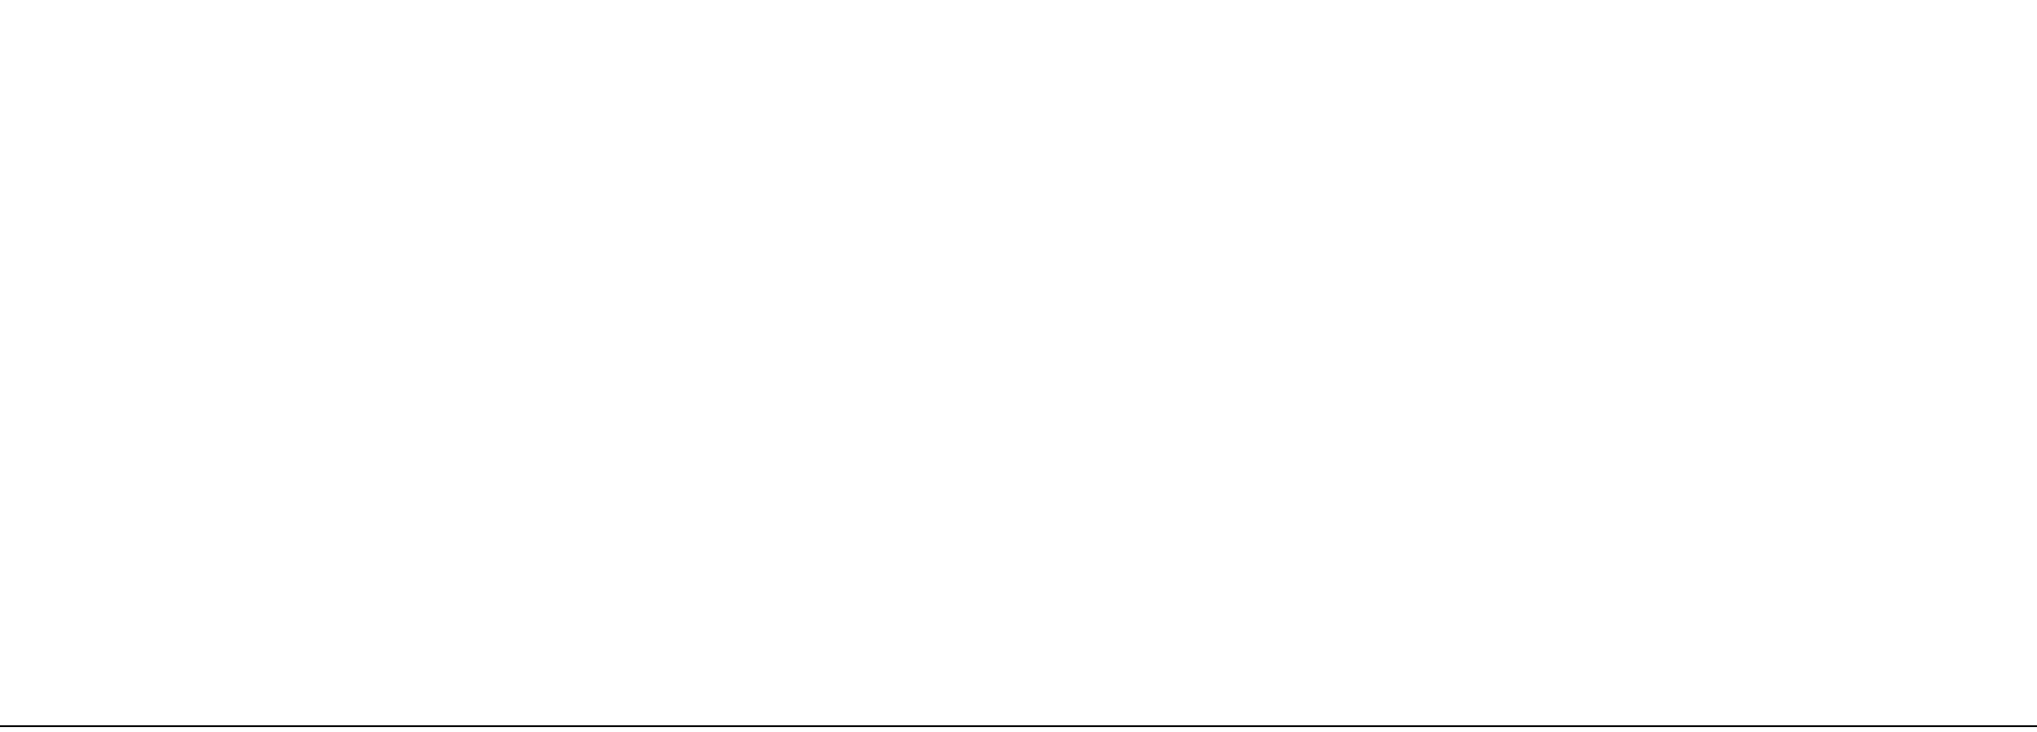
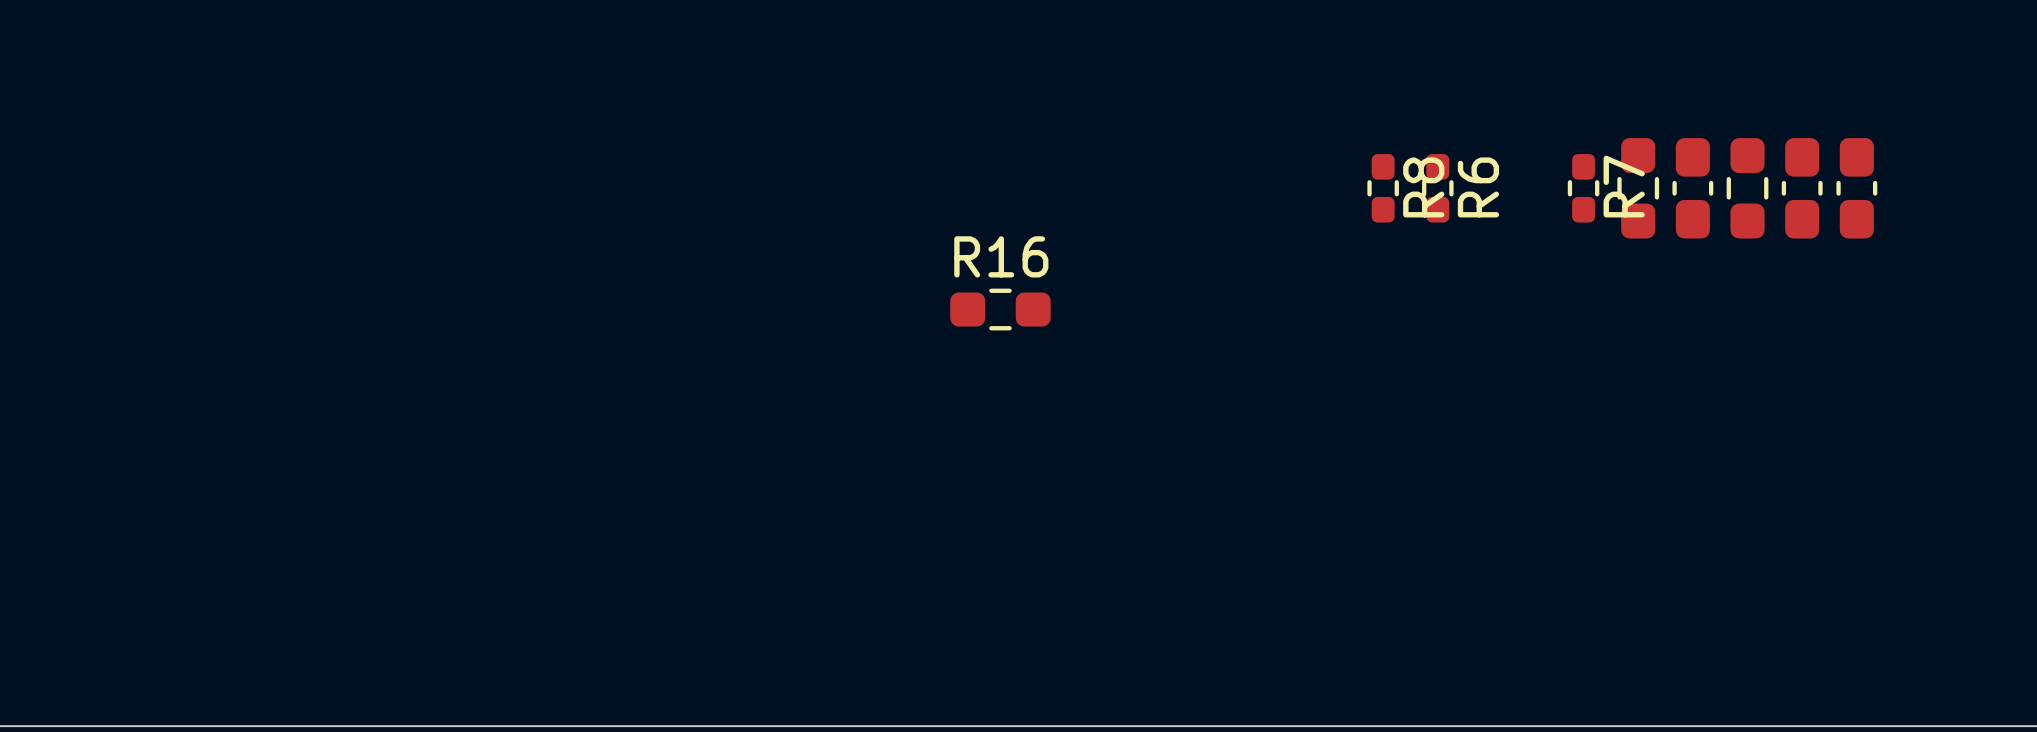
R8: none -> (1383, 188)
R6: none -> (1437, 188)
R7: none -> (1583, 188)
part: none -> (1638, 188)
part: none -> (1692, 188)
part: none -> (1747, 188)
part: none -> (1802, 188)
part: none -> (1856, 188)
R16: none -> (1000, 309)

